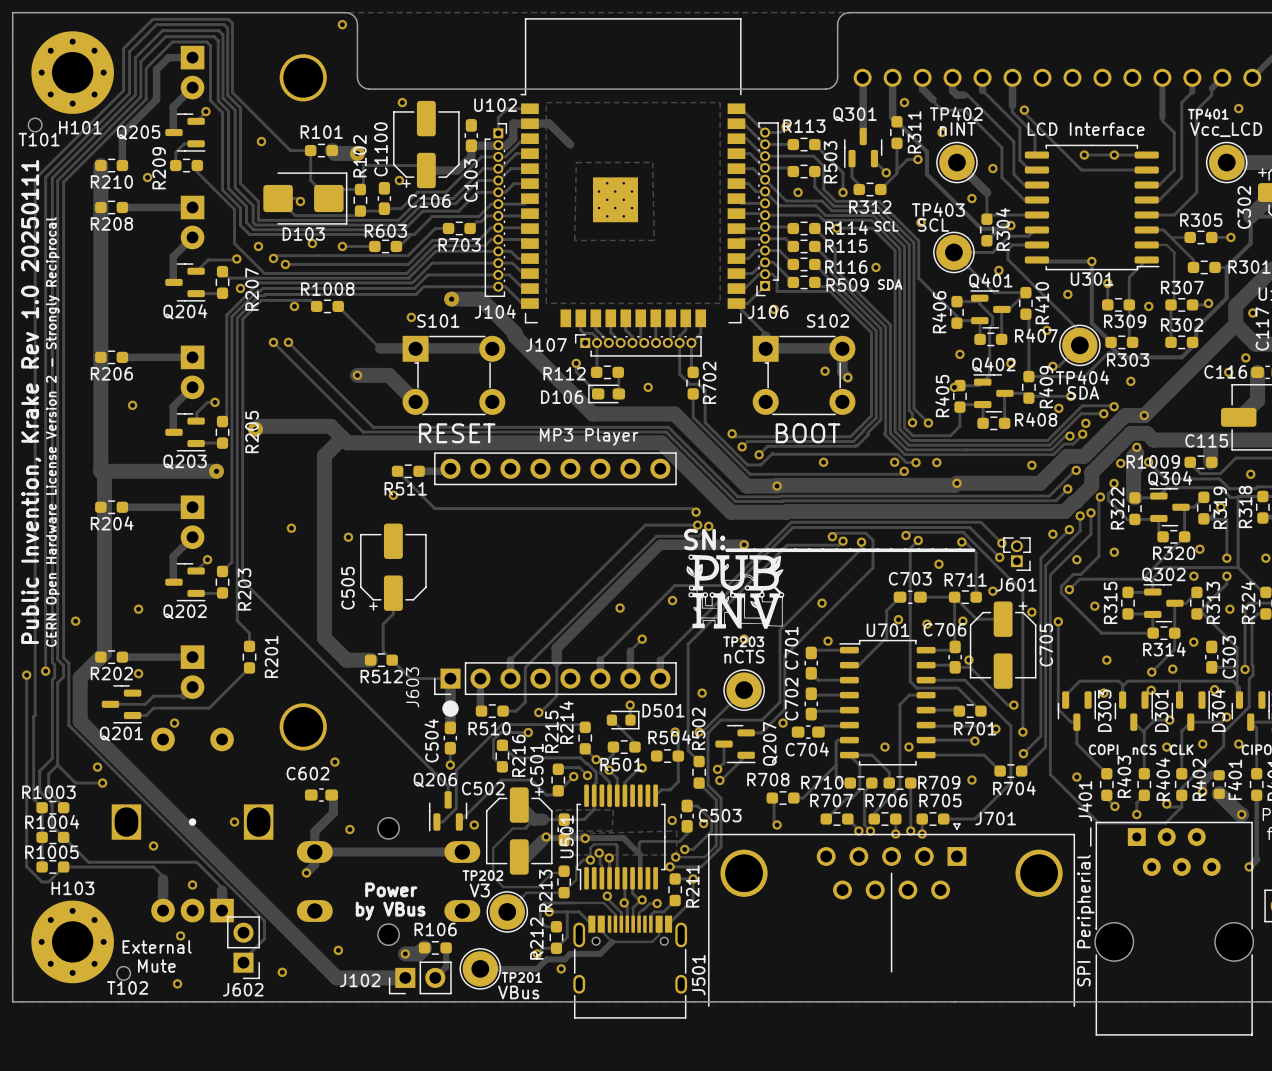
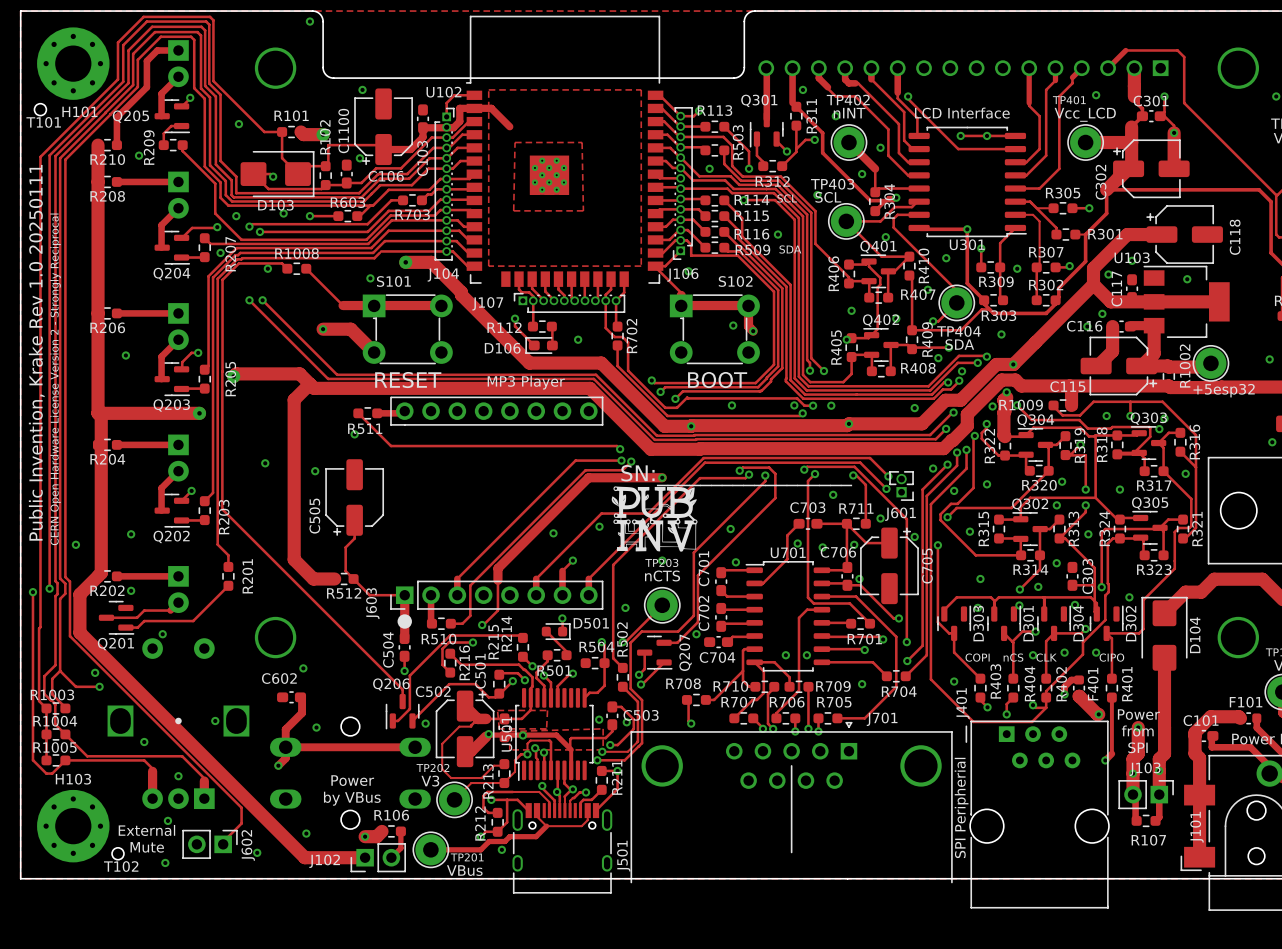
J602 rotation: 0° (243, 947) -> 90° counterclockwise (210, 844)

